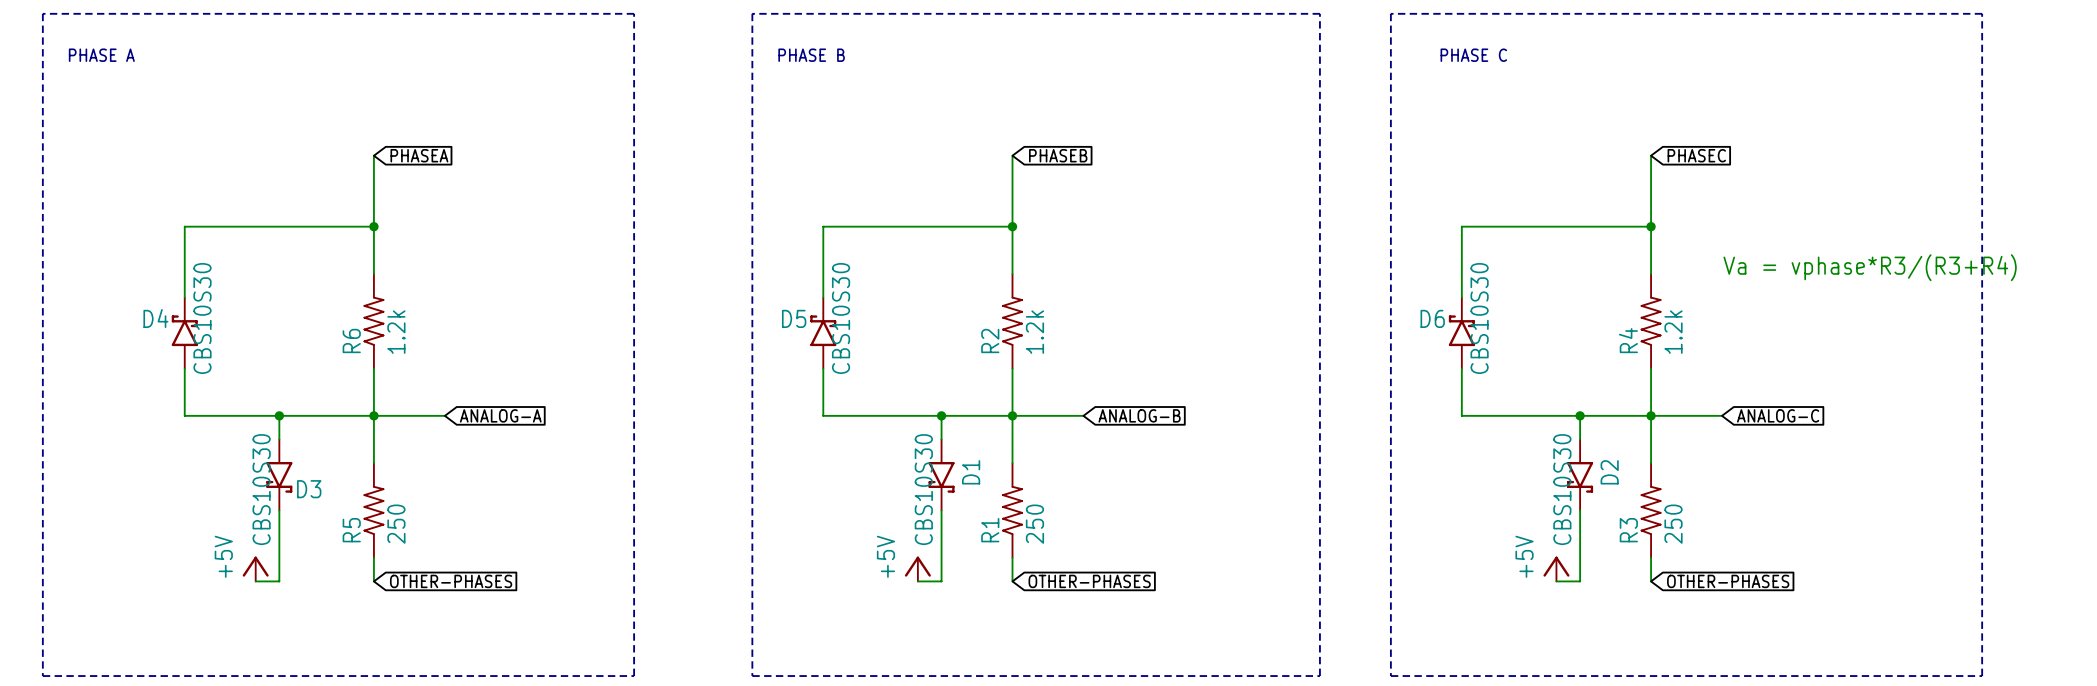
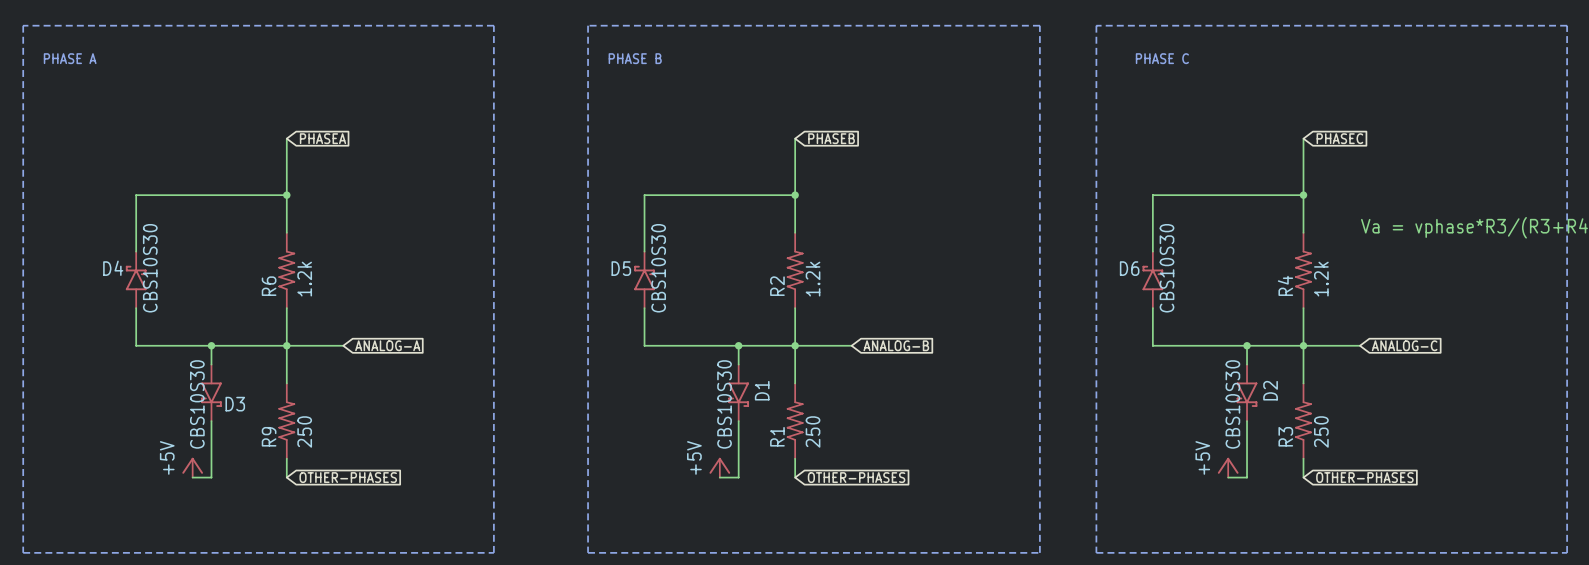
R5 name: R5 (351, 530) -> R9 (269, 436)

